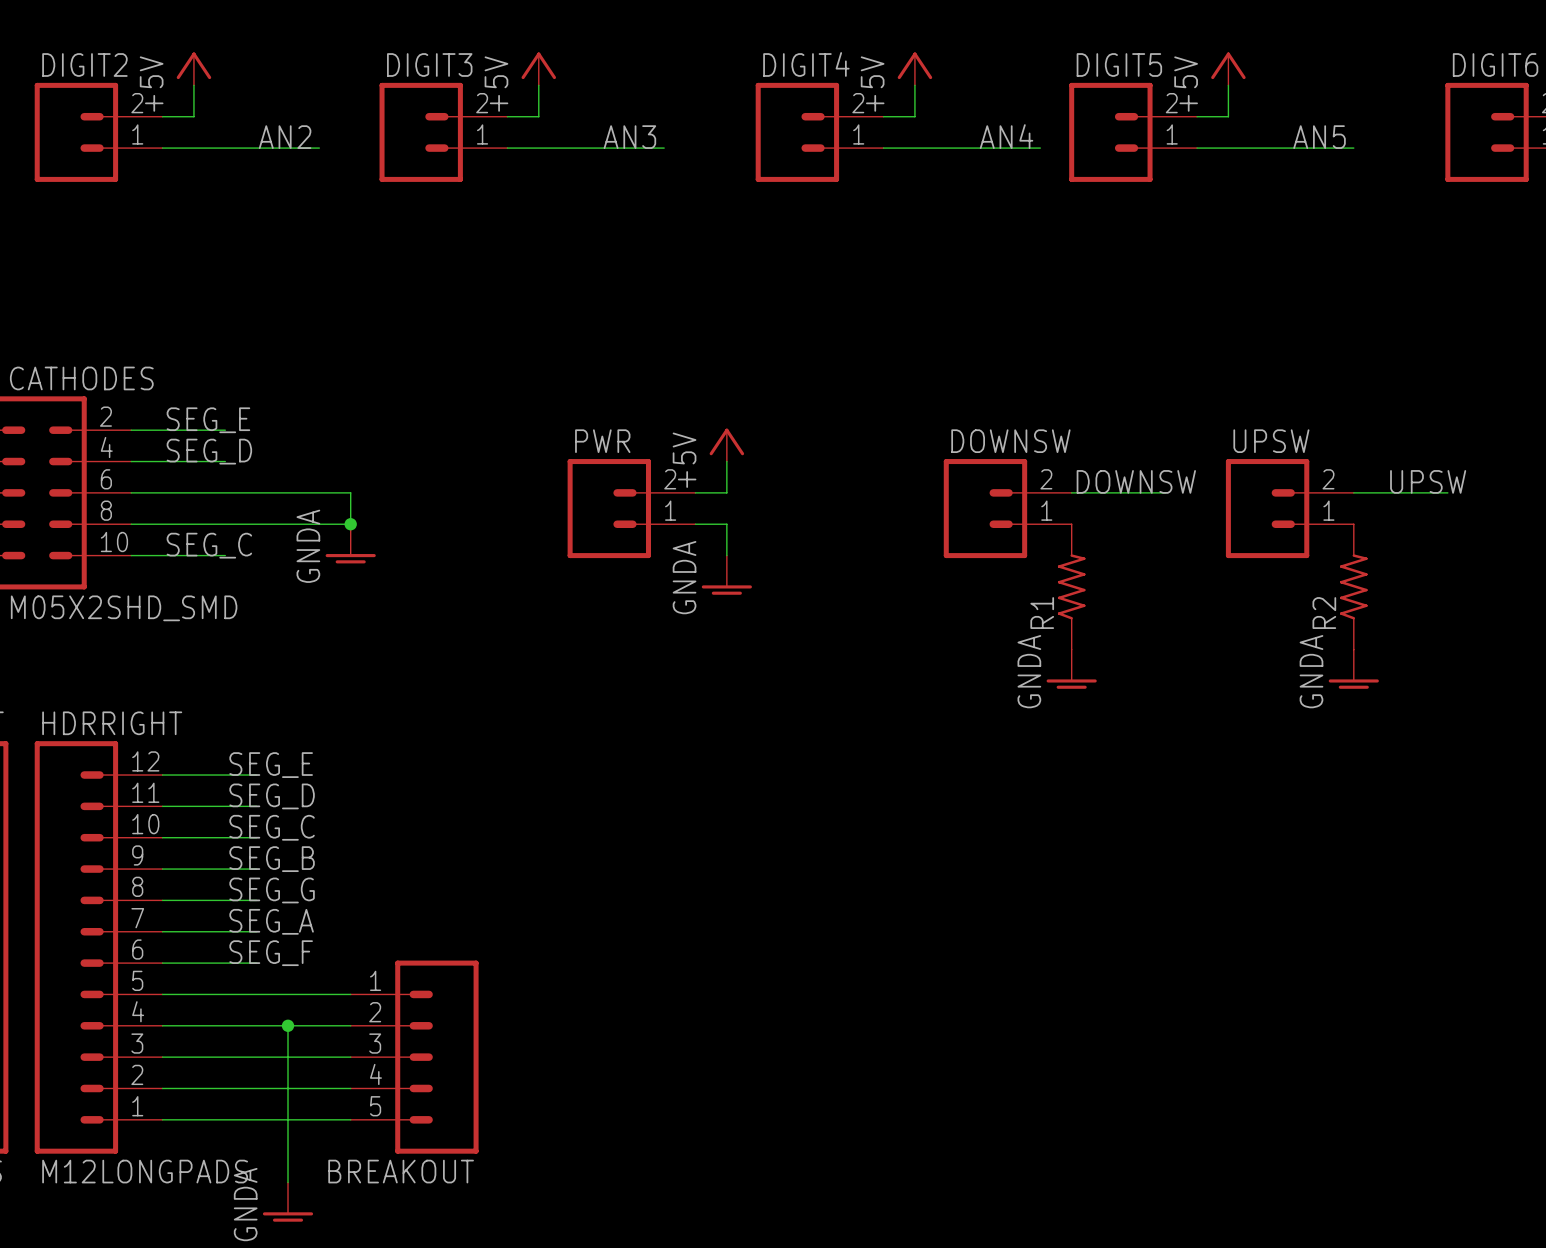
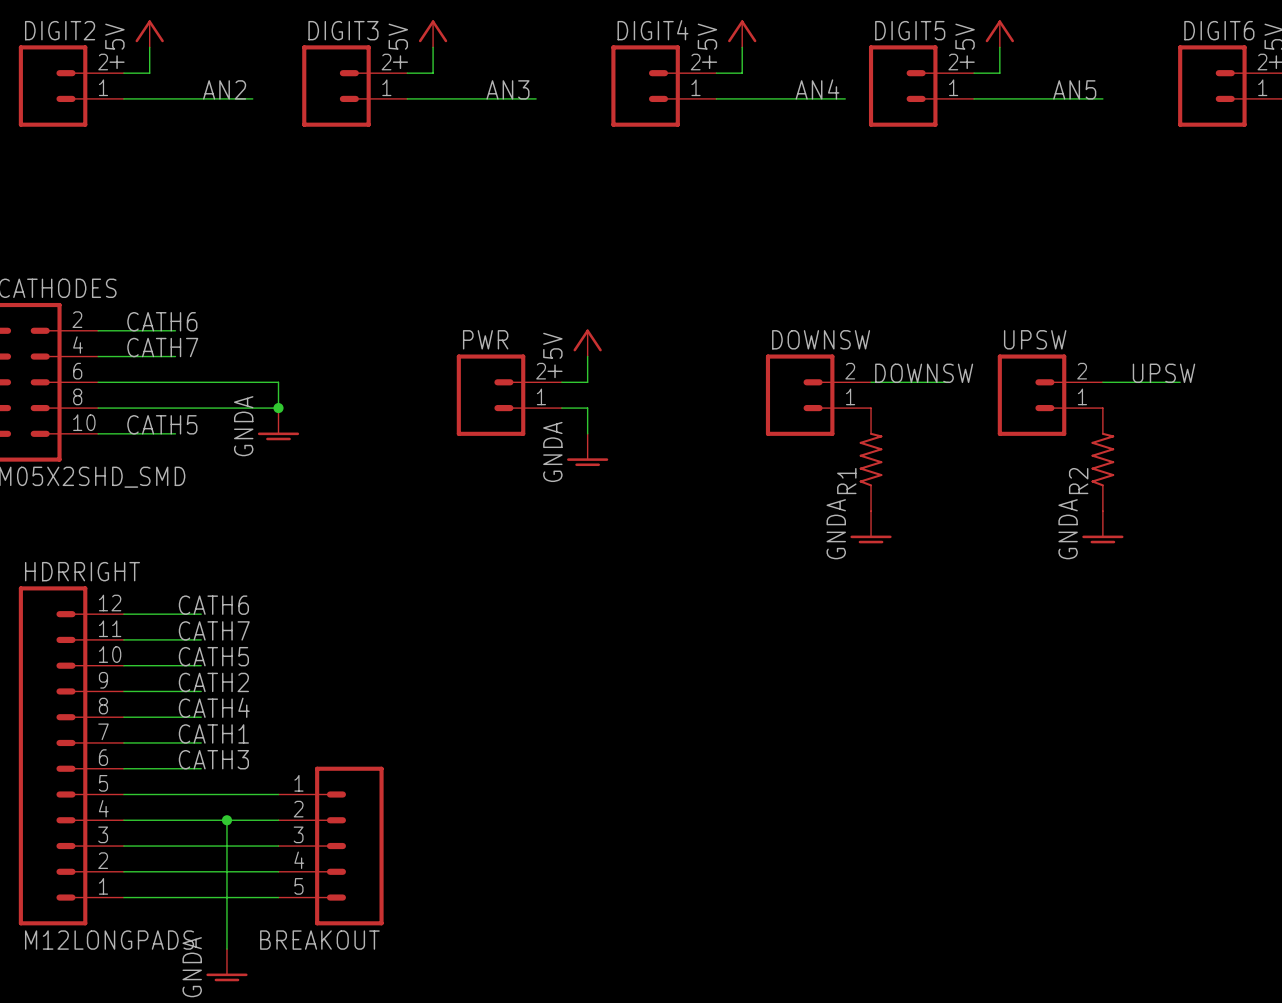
label: SEG_E (208, 420) -> CATH6 (162, 321)
label: SEG_D (209, 451) -> CATH7 (162, 347)
label: SEG_C (209, 545) -> CATH5 (162, 424)
label: SEG_E (271, 765) -> CATH6 (213, 605)
label: SEG_D (272, 796) -> CATH7 (214, 630)
label: SEG_C (272, 827) -> CATH5 (213, 656)
label: SEG_B (272, 859) -> CATH2 (213, 682)
label: SEG_G (272, 890) -> CATH4 (214, 707)
label: SEG_A (271, 921) -> CATH1 (213, 733)
label: SEG_F (271, 953) -> CATH3 (213, 759)

